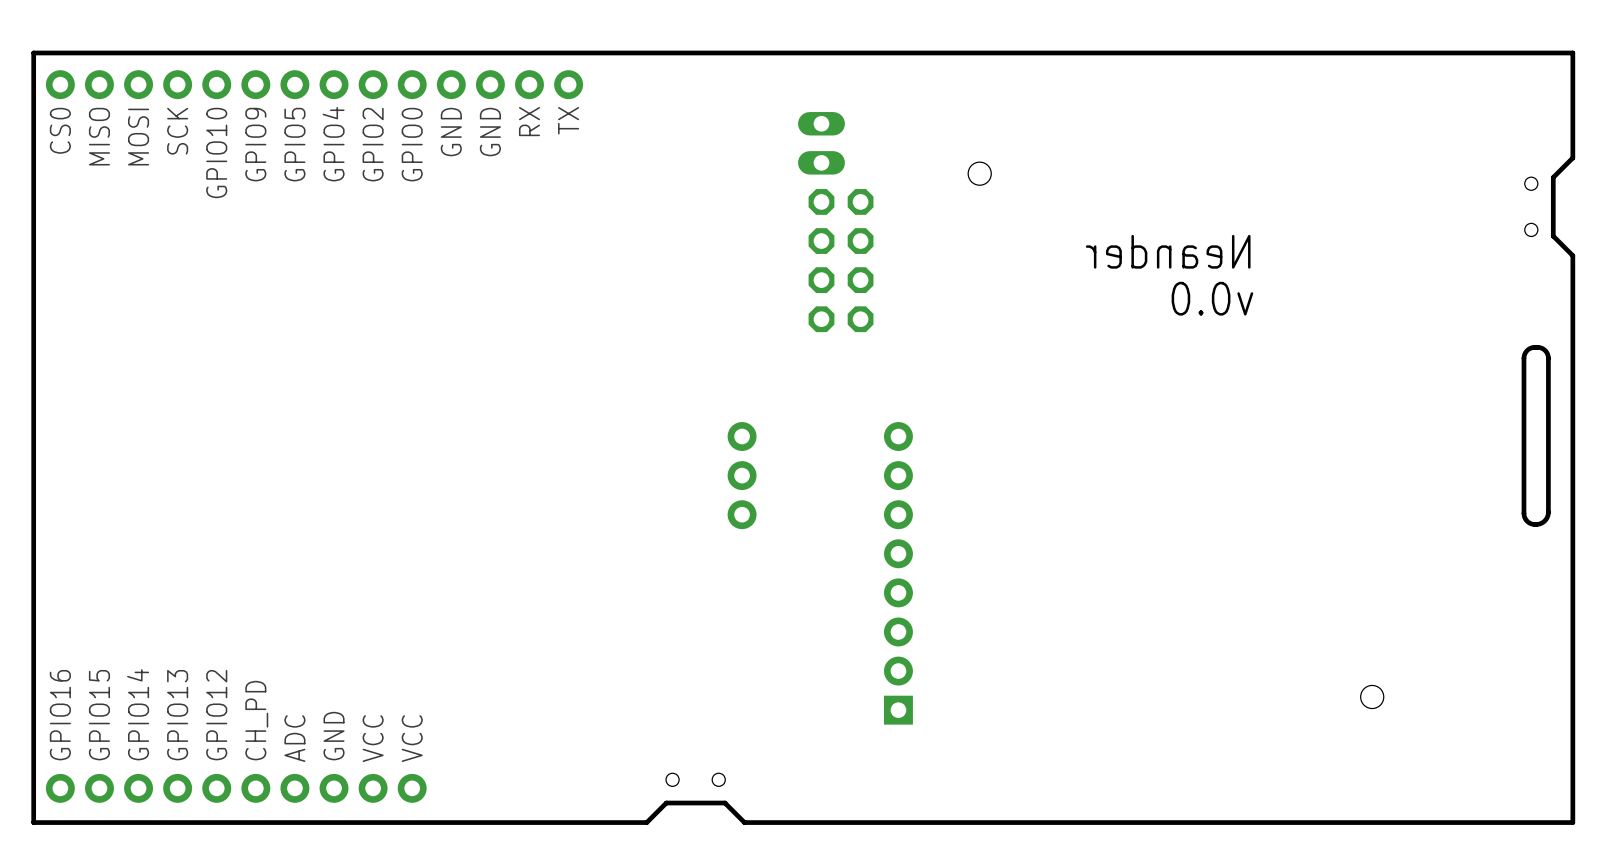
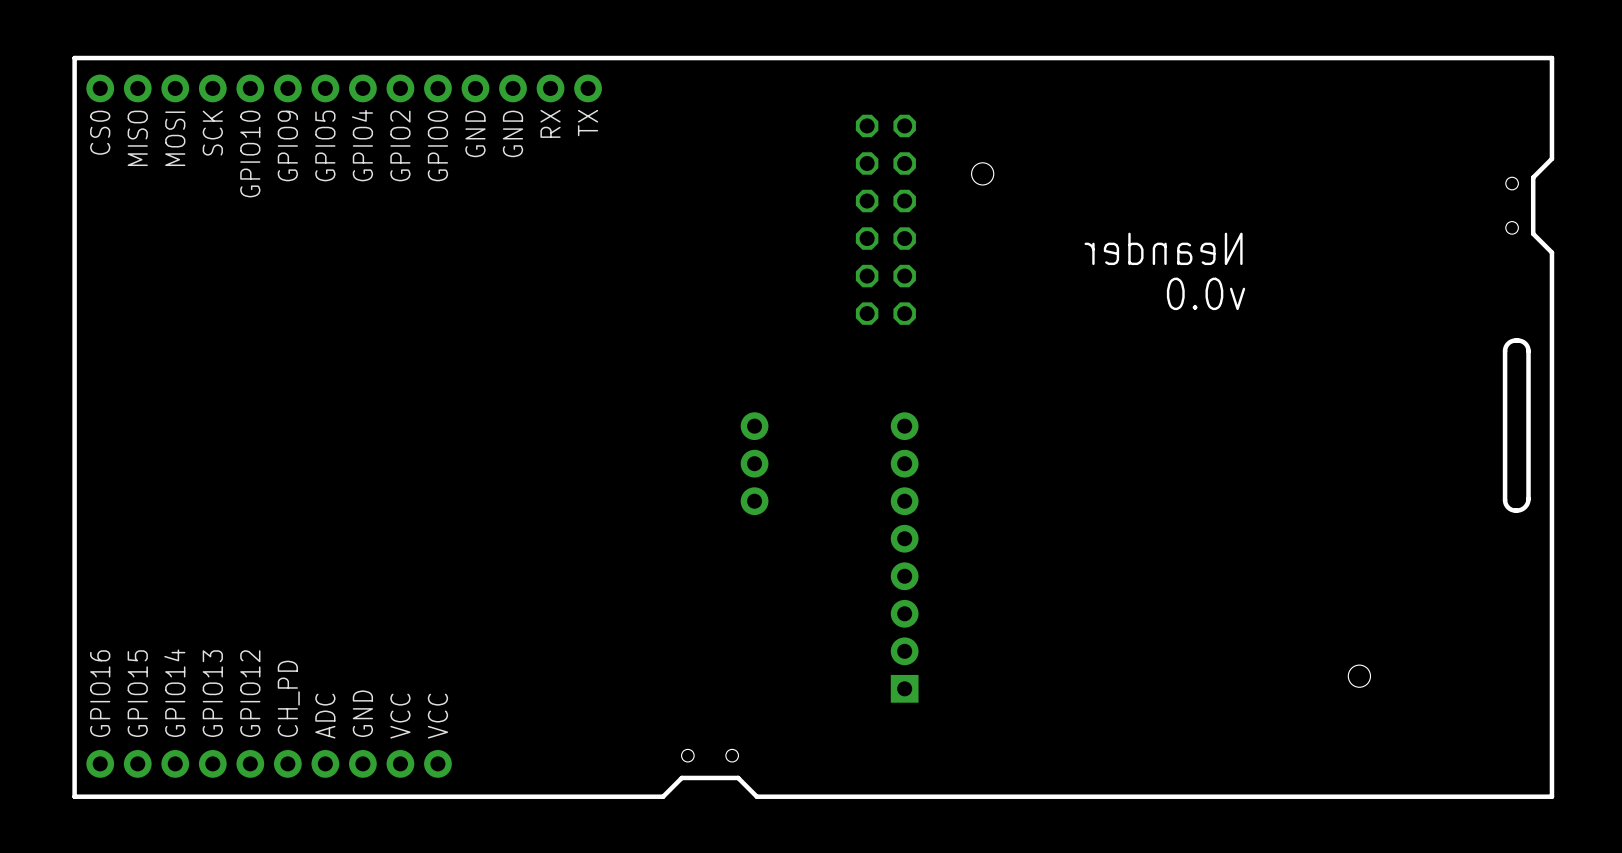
part: (821, 143) -> none
part: none -> (885, 219)
part: (841, 260) -> none

